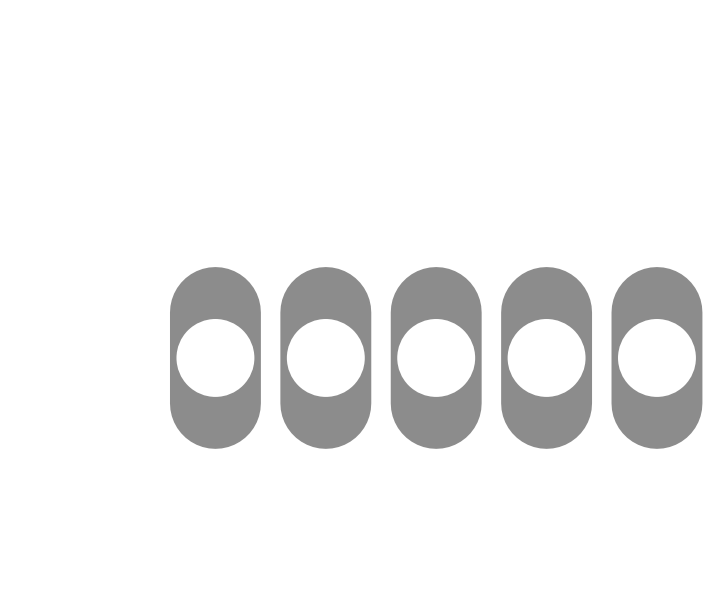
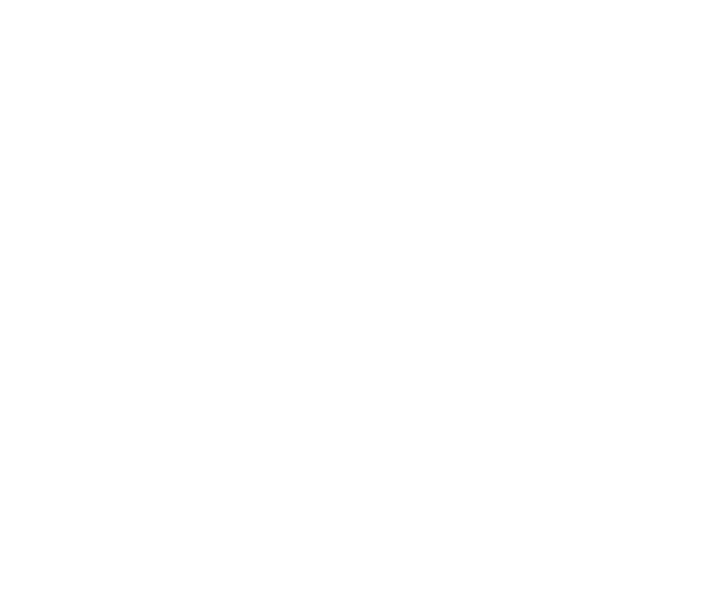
part: (436, 357) -> none

